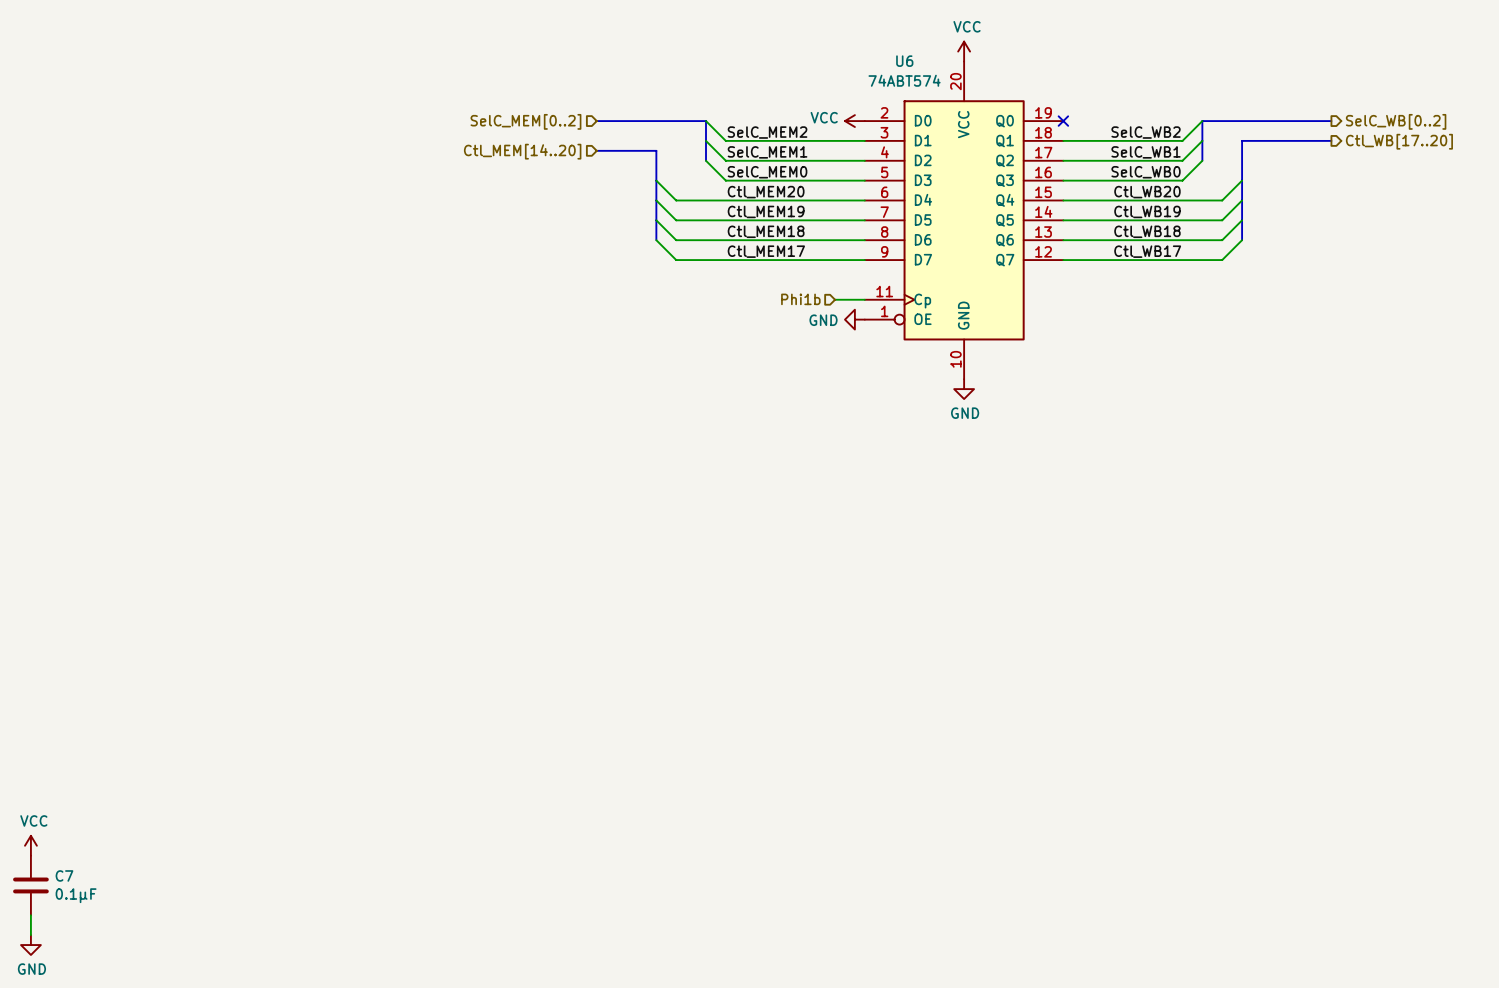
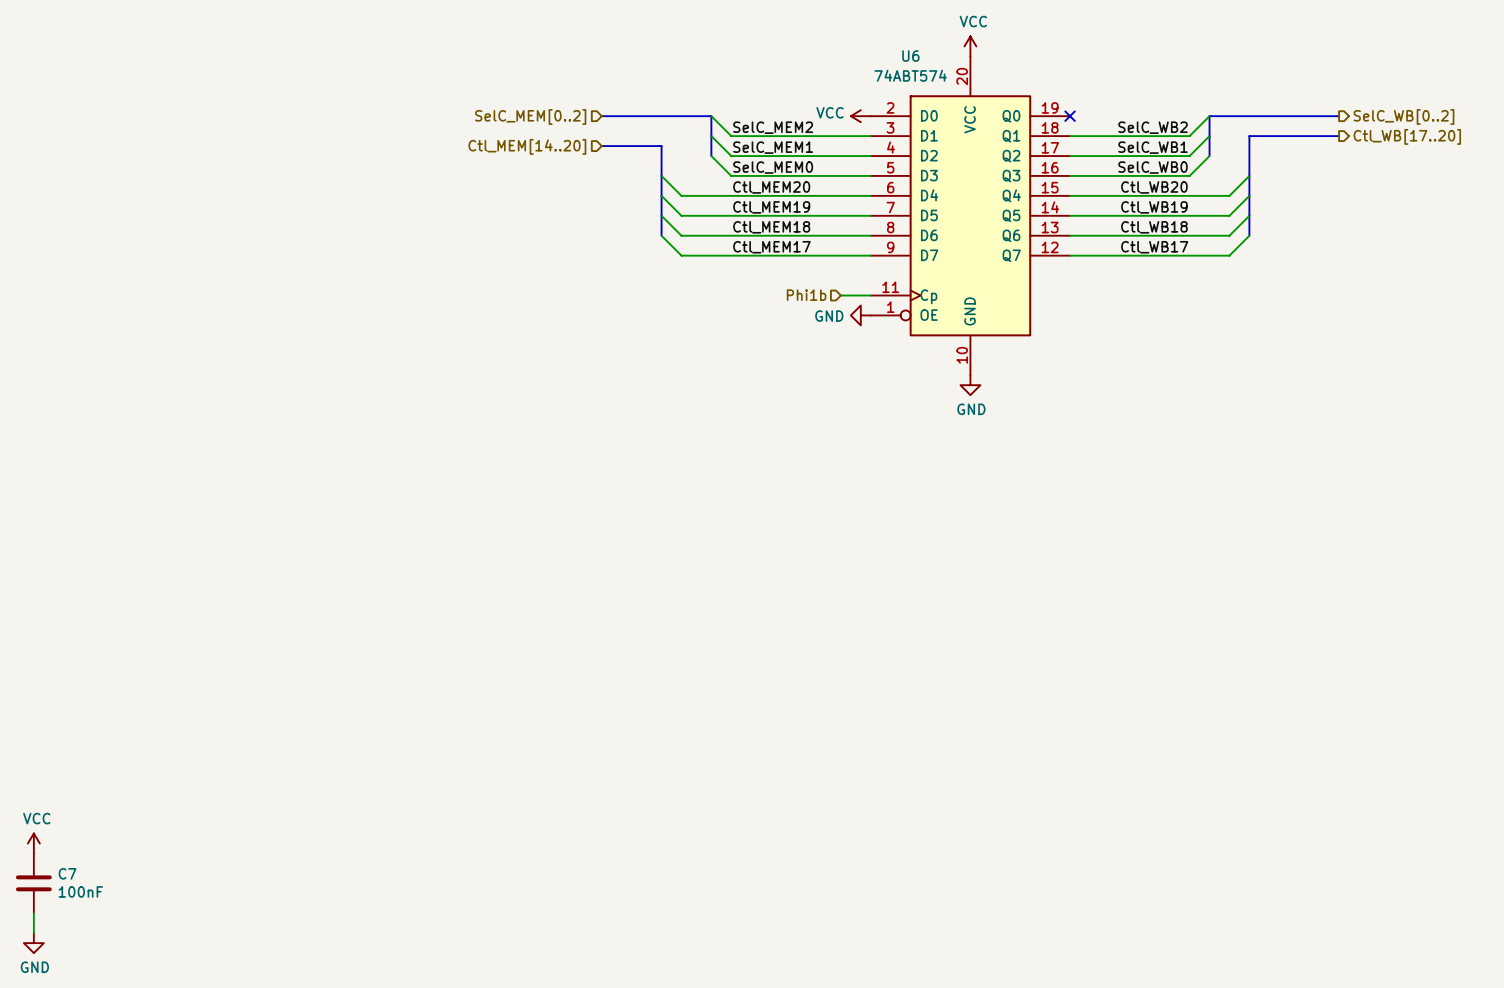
C7 value: 0.1μF (76, 895) -> 100nF (80, 891)

